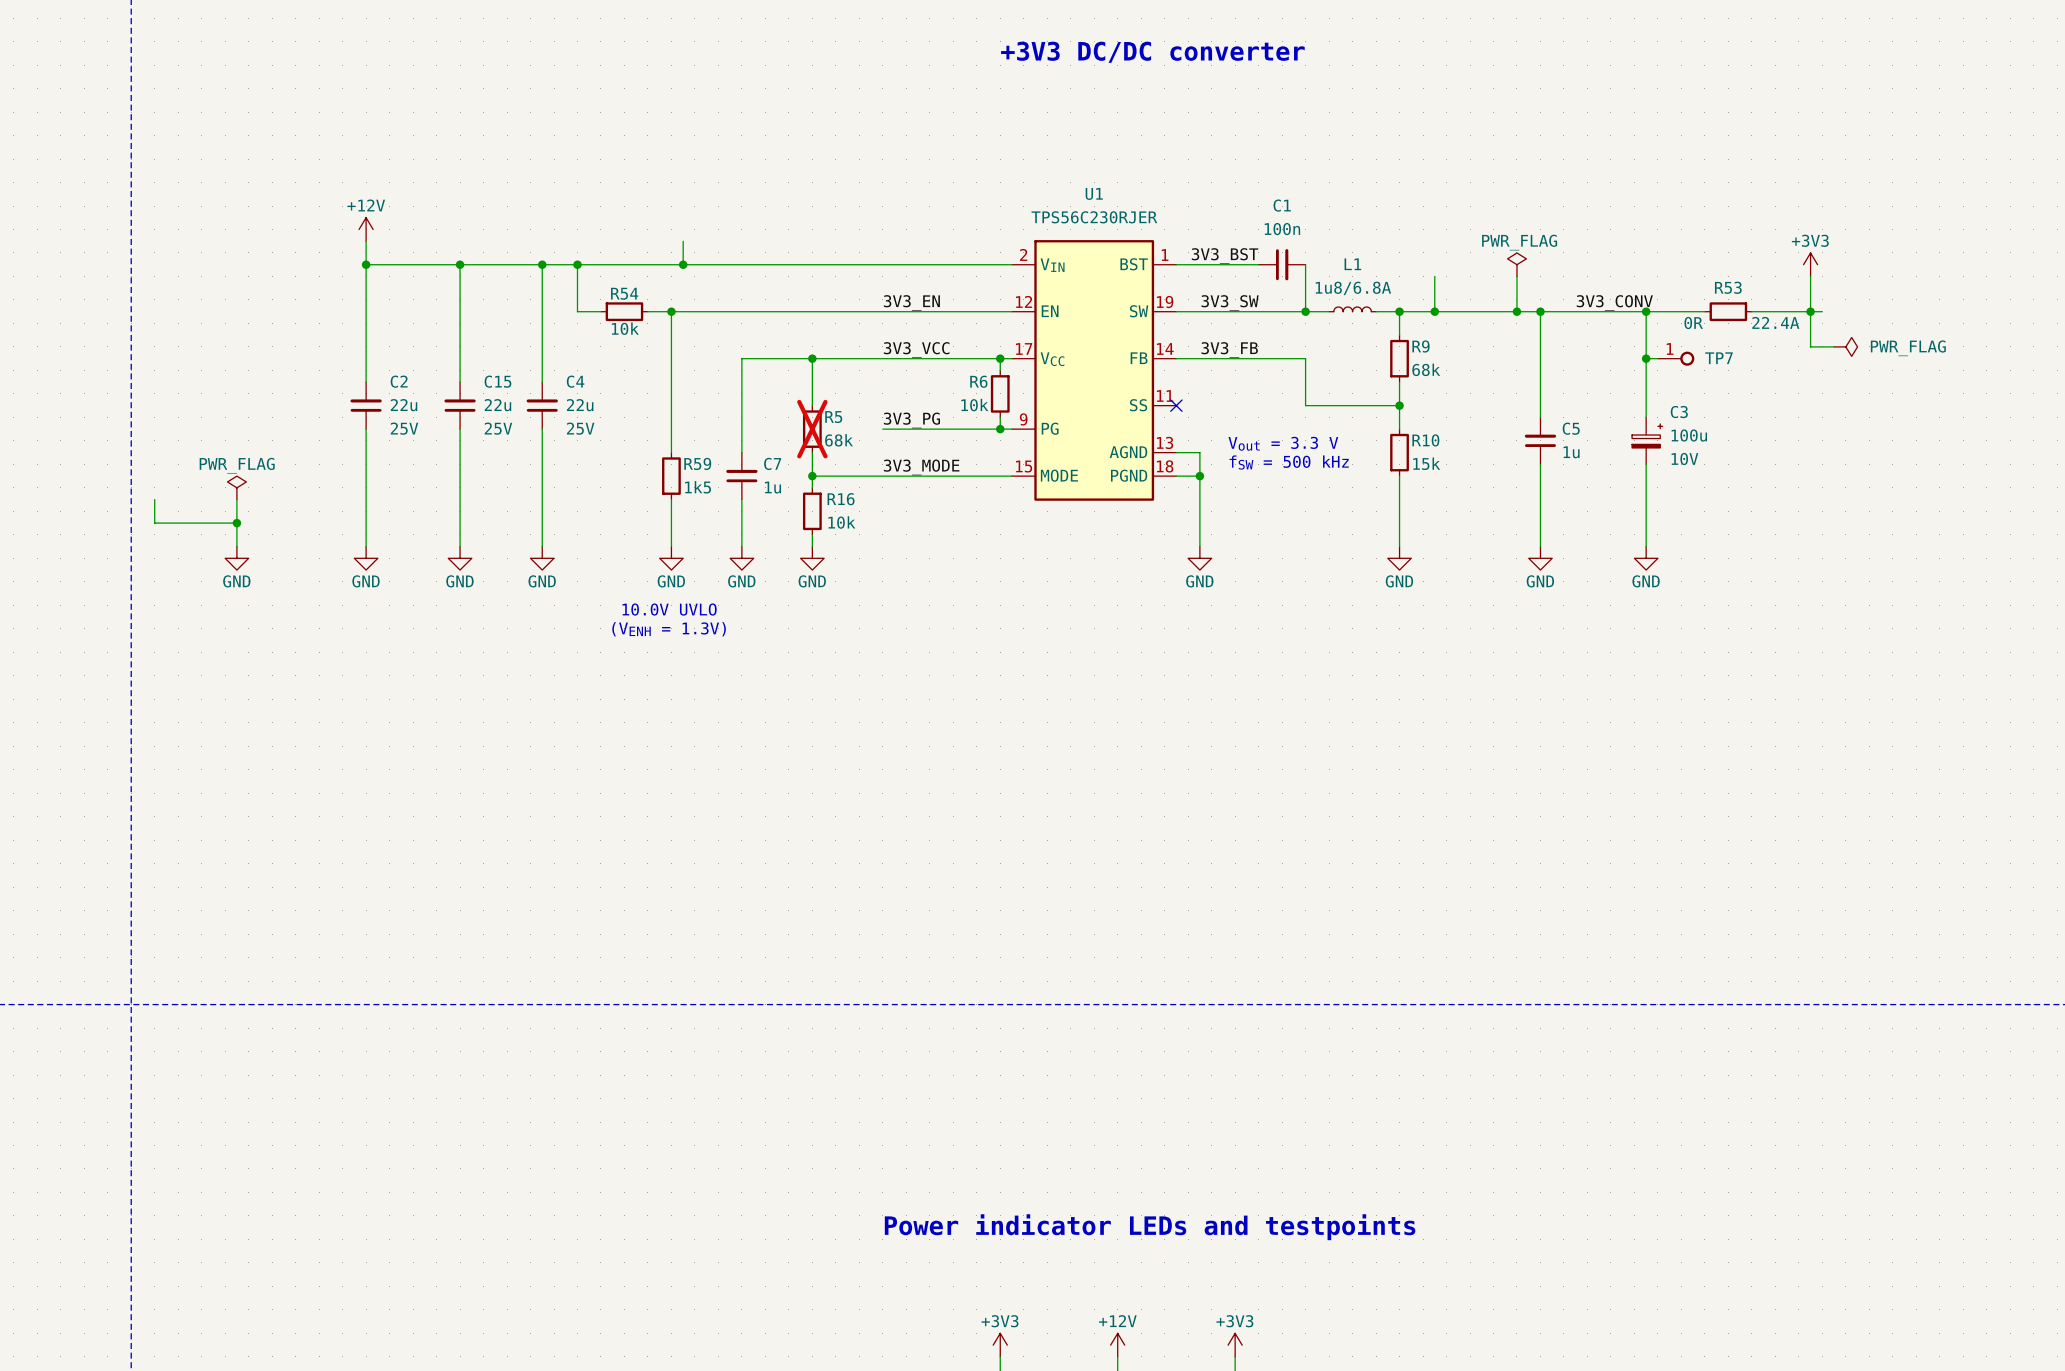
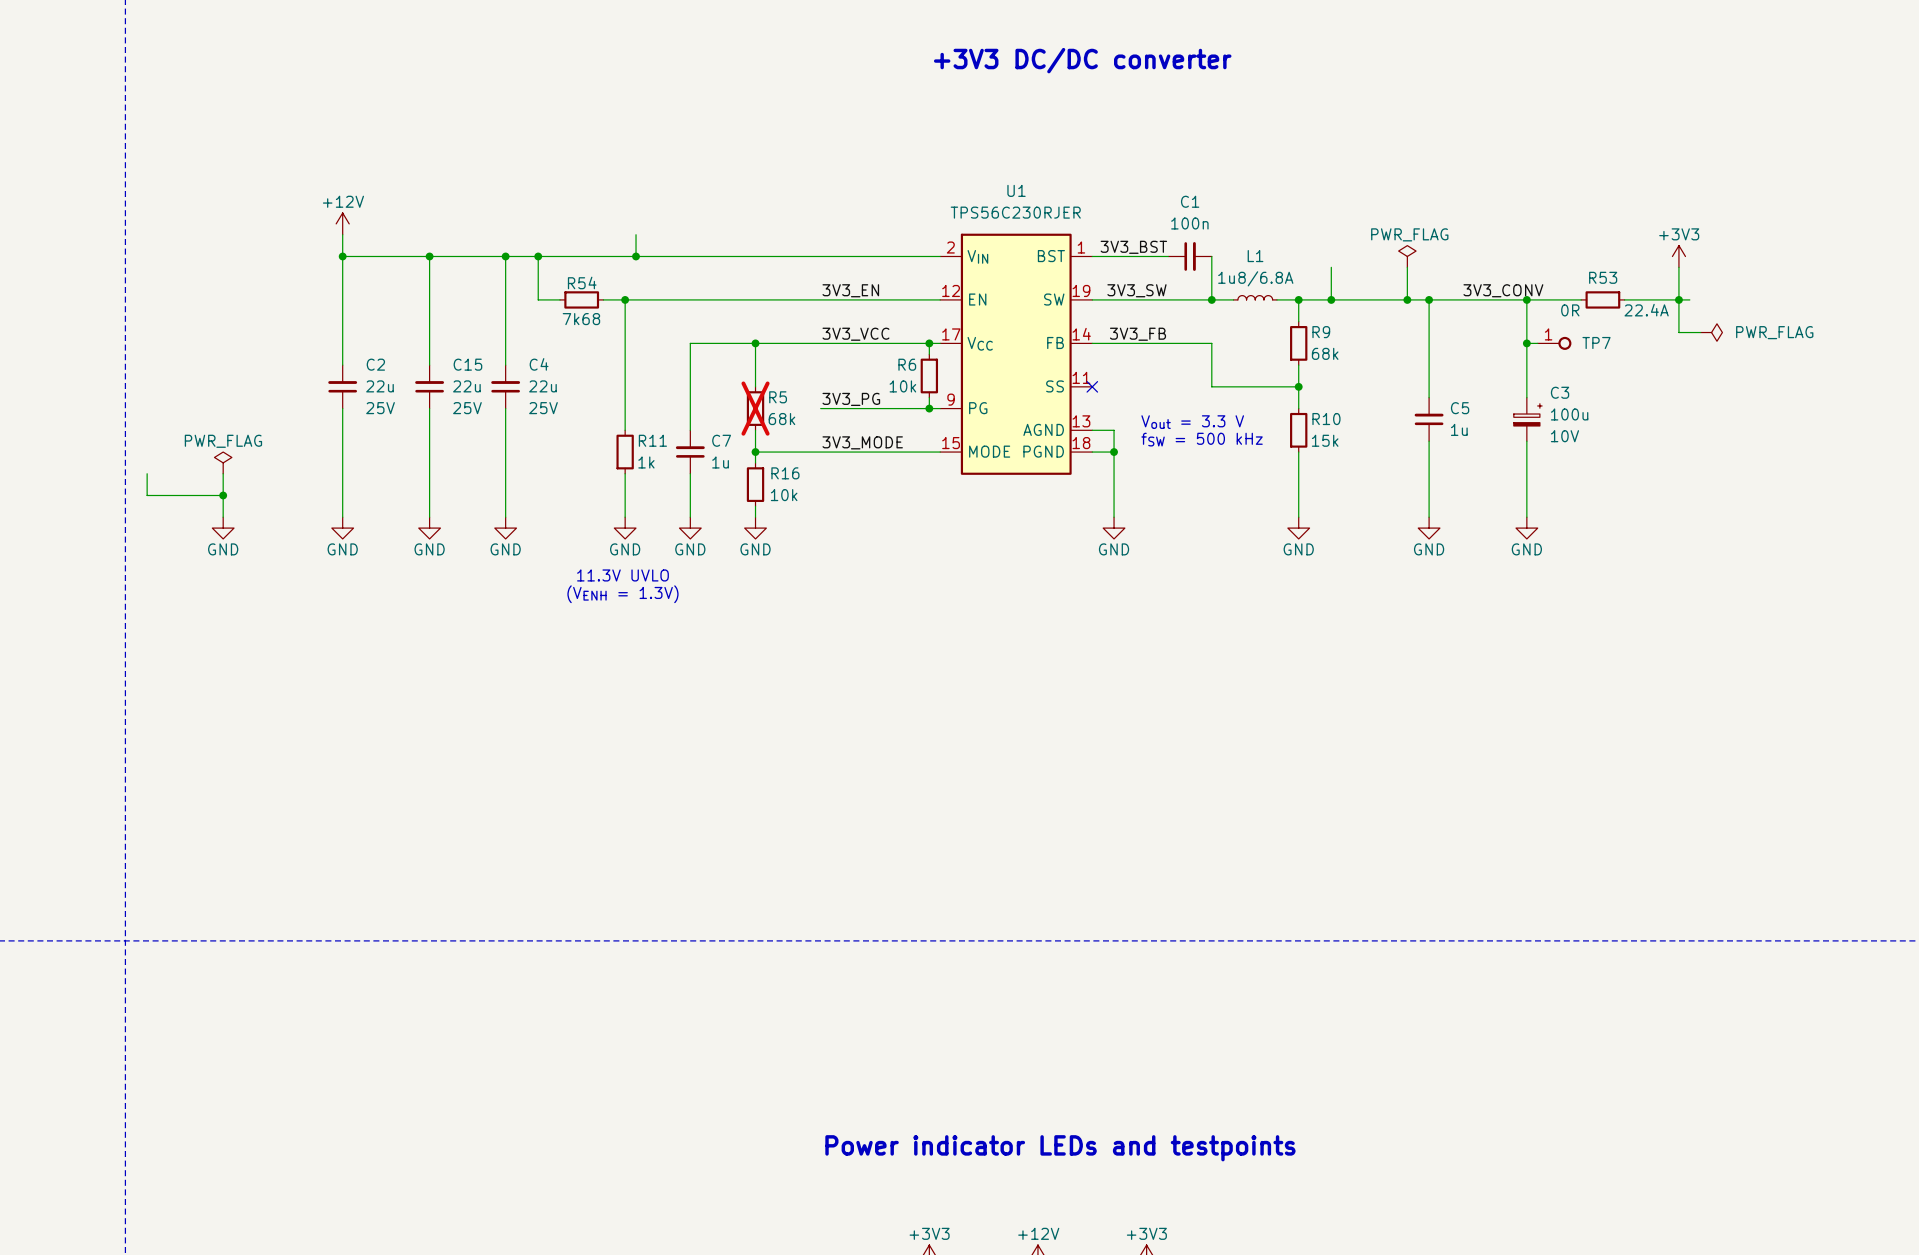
R54 text: 10k (625, 328) -> 7k68 (581, 319)
R59 name: R59 (697, 463) -> R11 (652, 440)
R59 text: 1k5 (698, 487) -> 1k (646, 462)
text: 10.0V UVLO (669, 609) -> 11.3V UVLO (622, 575)

